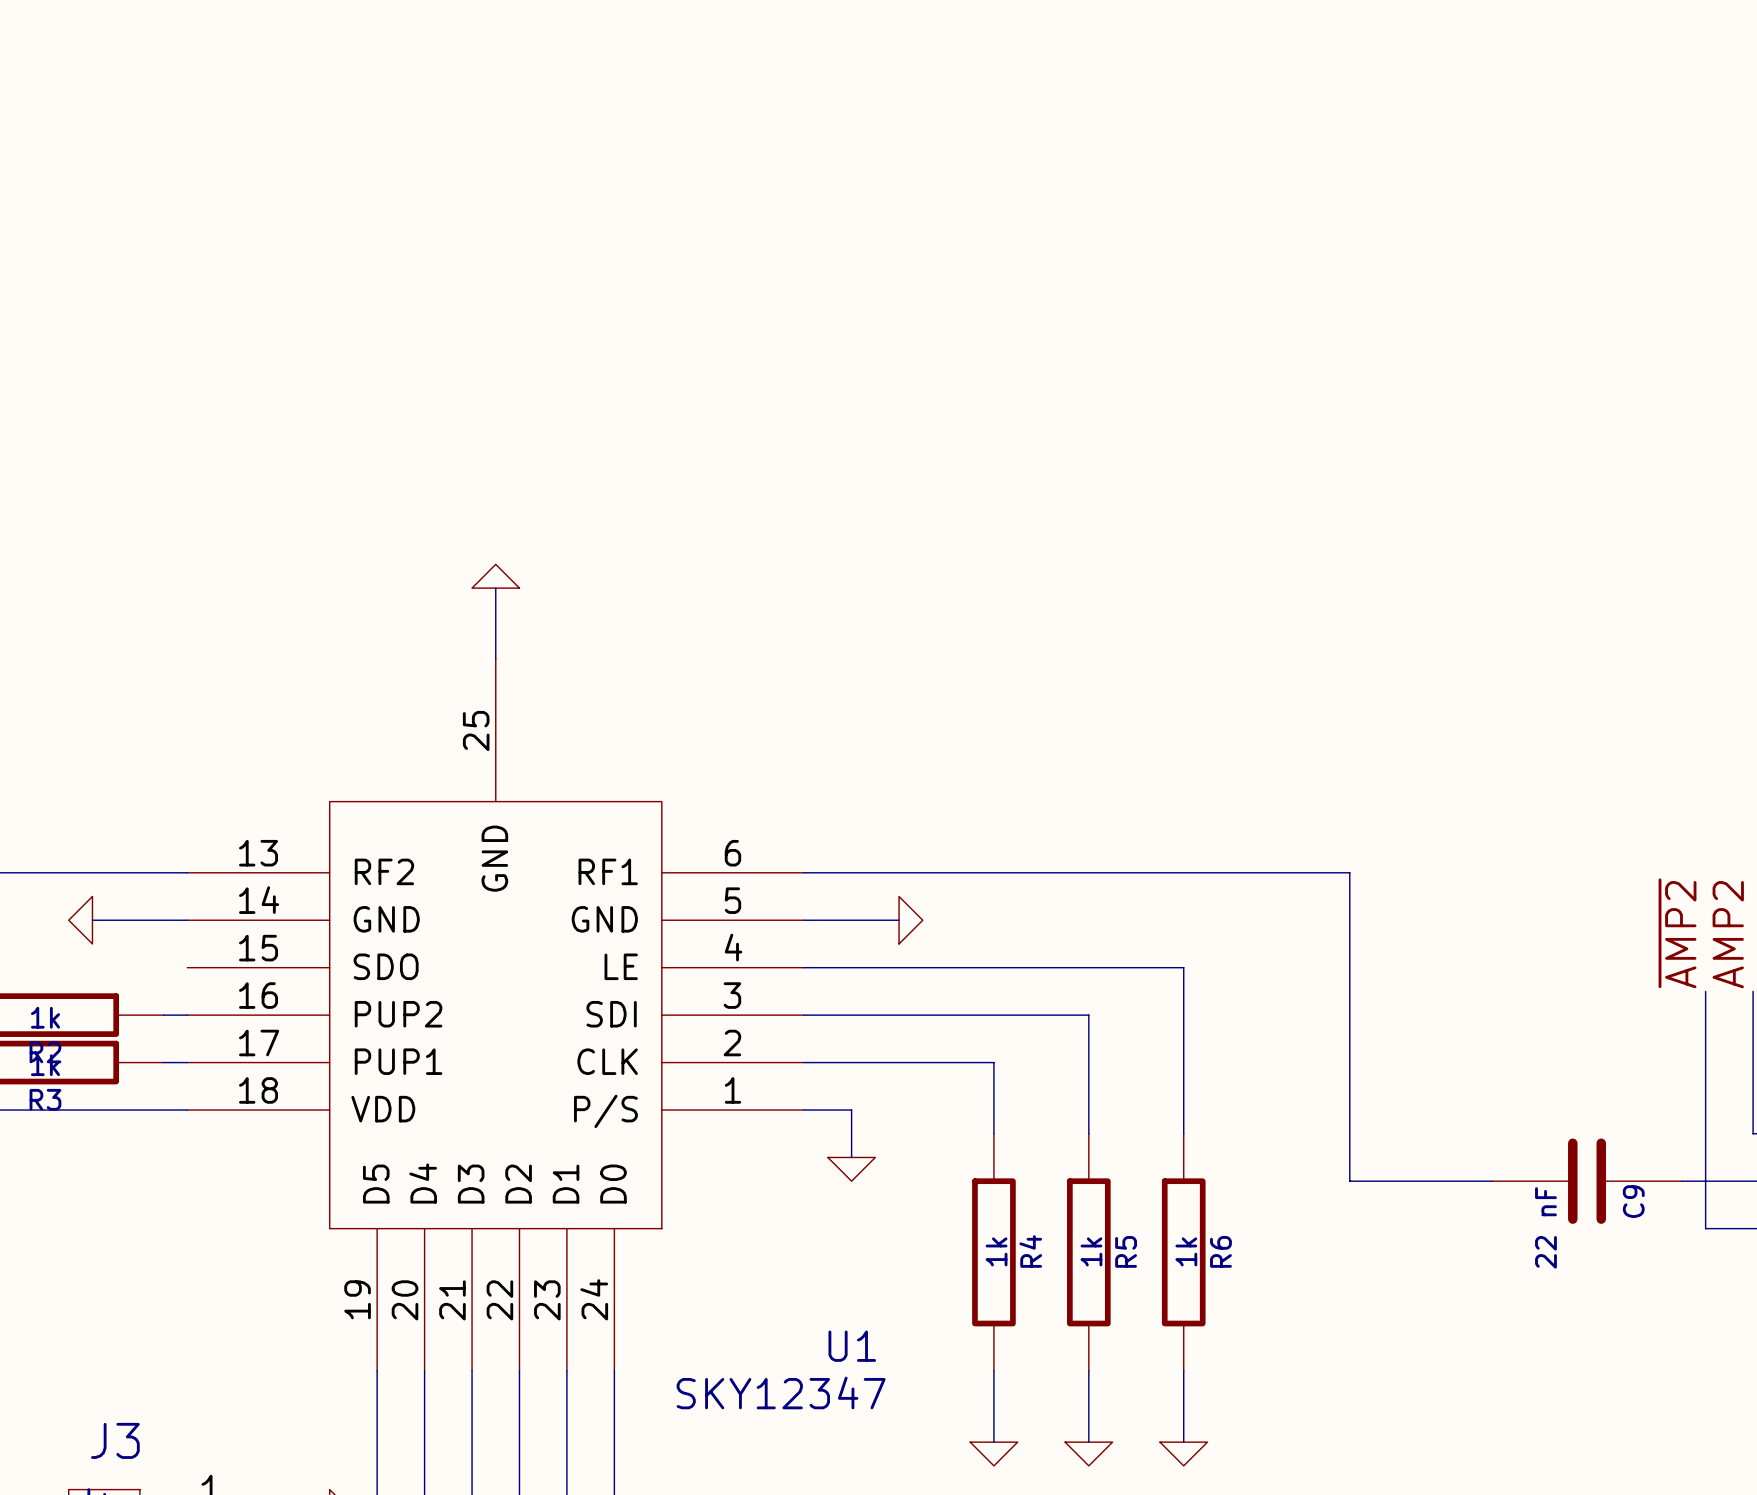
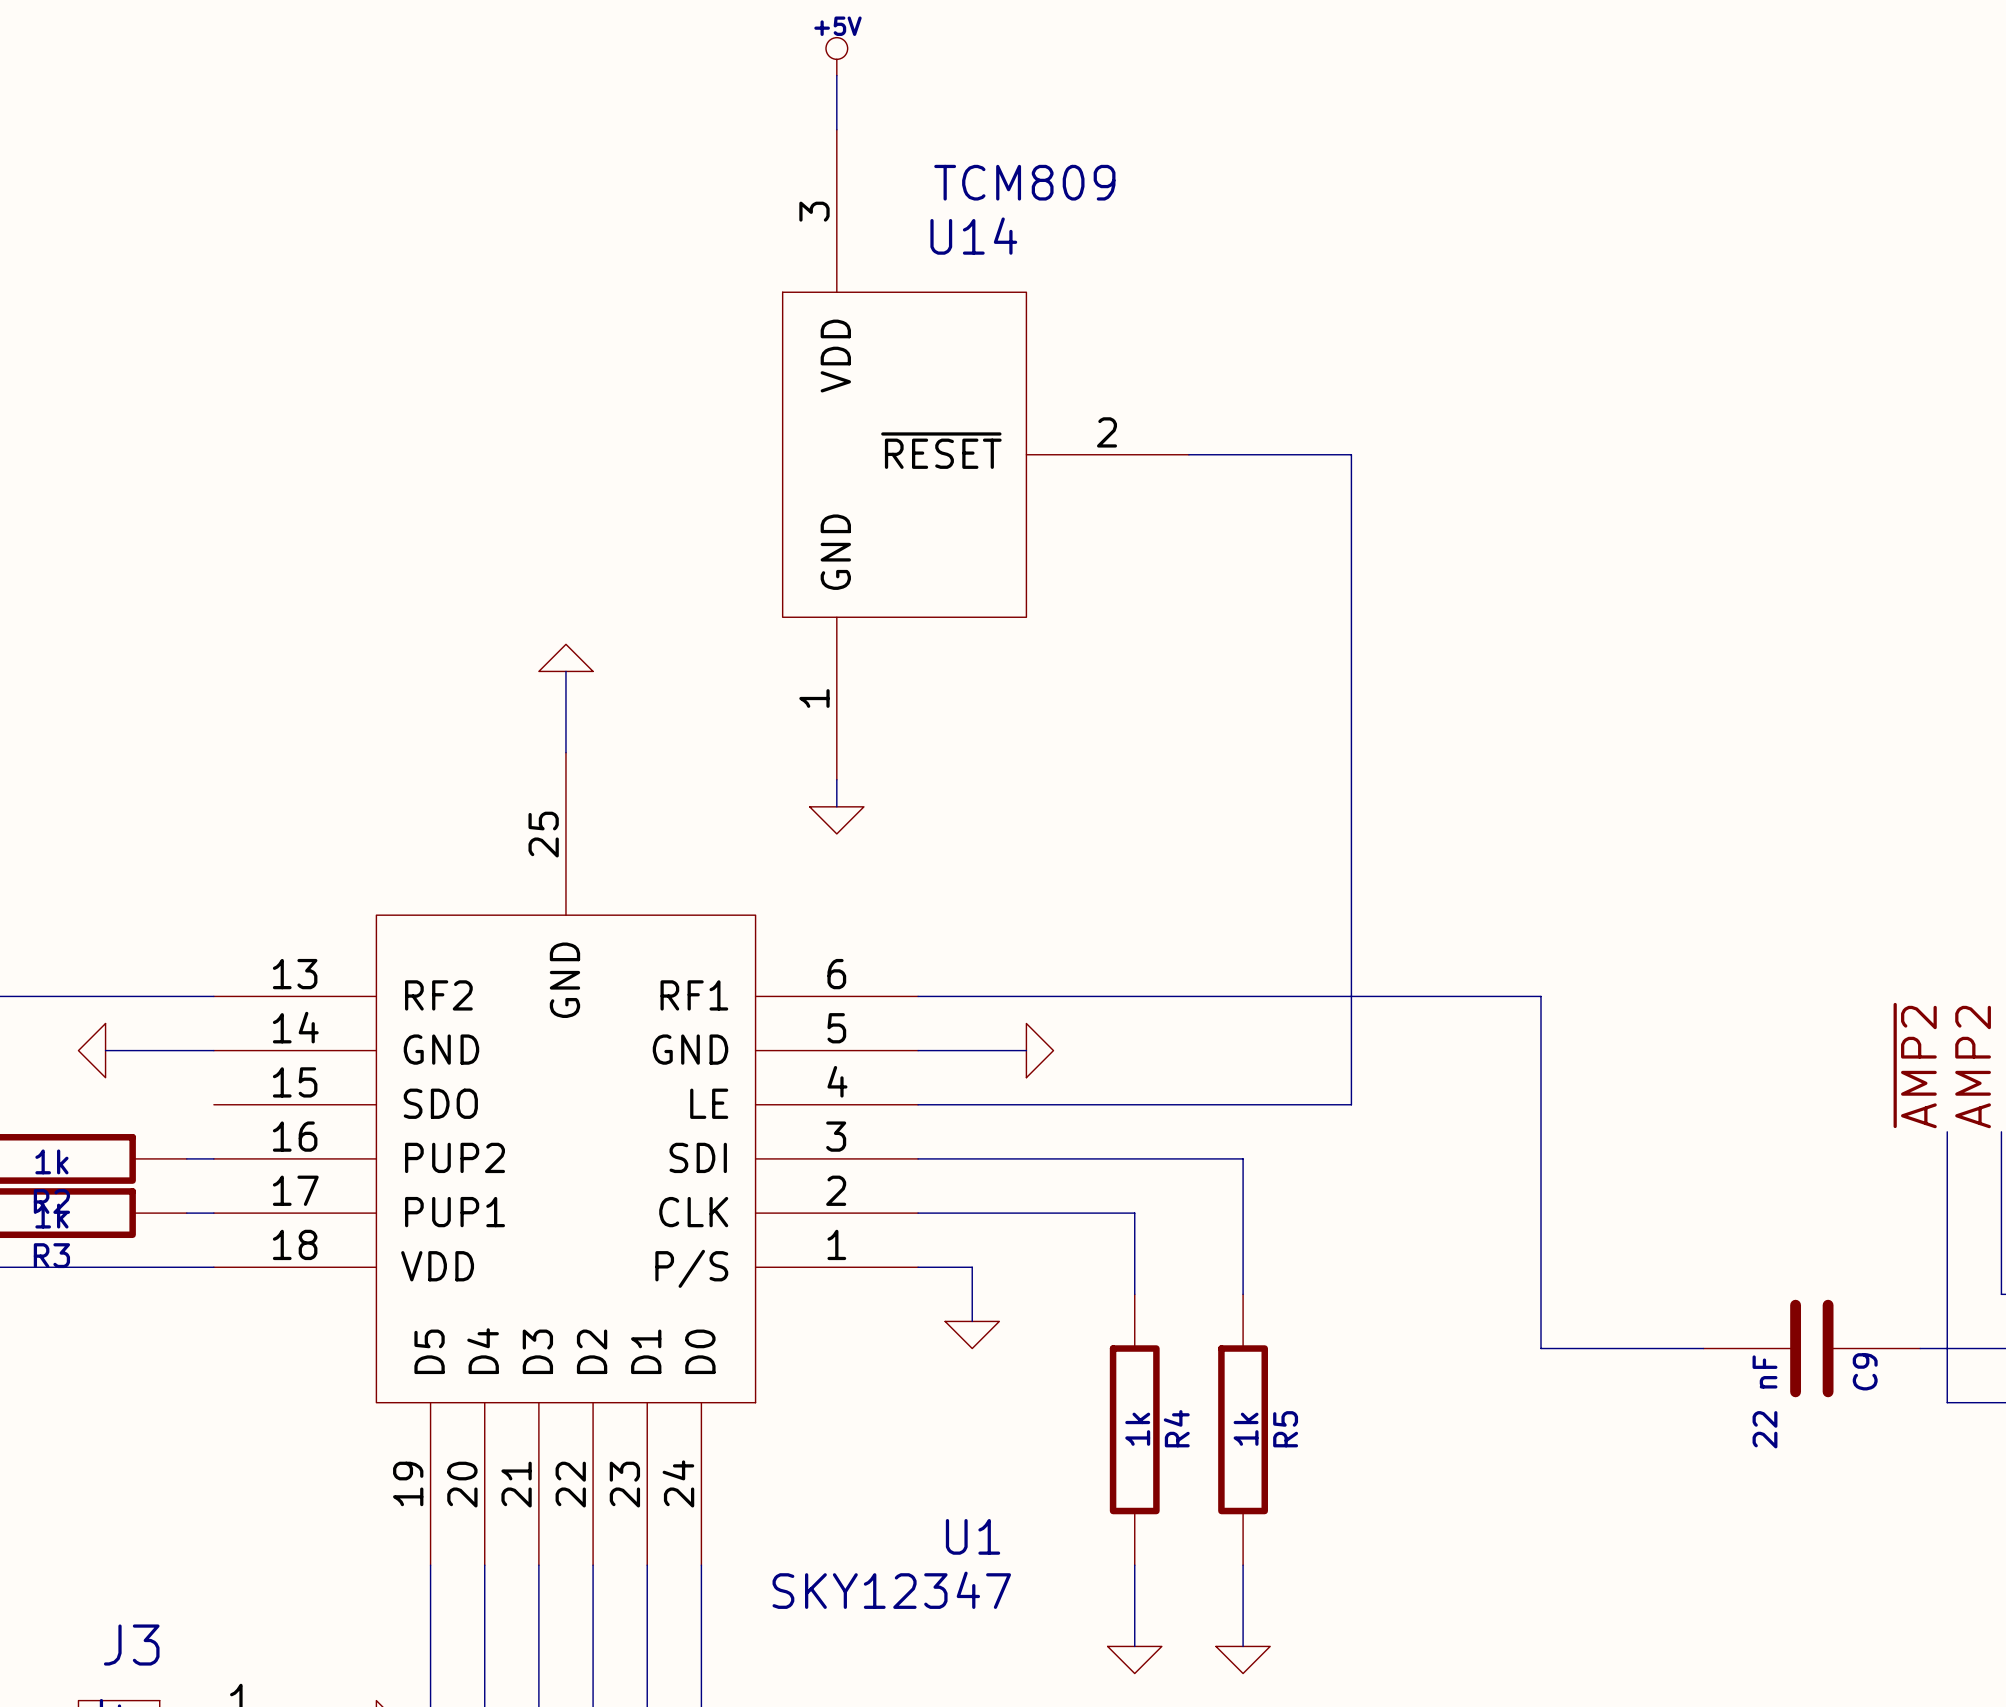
power symbol: none -> +5V (836, 56)
wire: none -> (836, 75) (836, 129)
U14: none -> TCM809 (985, 454)
wire: none -> (836, 779) (836, 806)
power symbol: none -> (836, 820)
wire: (1183, 967) (1183, 1133) -> (1351, 1104) (1351, 454) (1188, 454)
R6: 1k (1183, 1252) -> none
wire: (1183, 1370) (1183, 1442) -> none
power symbol: (1183, 1454) -> none

